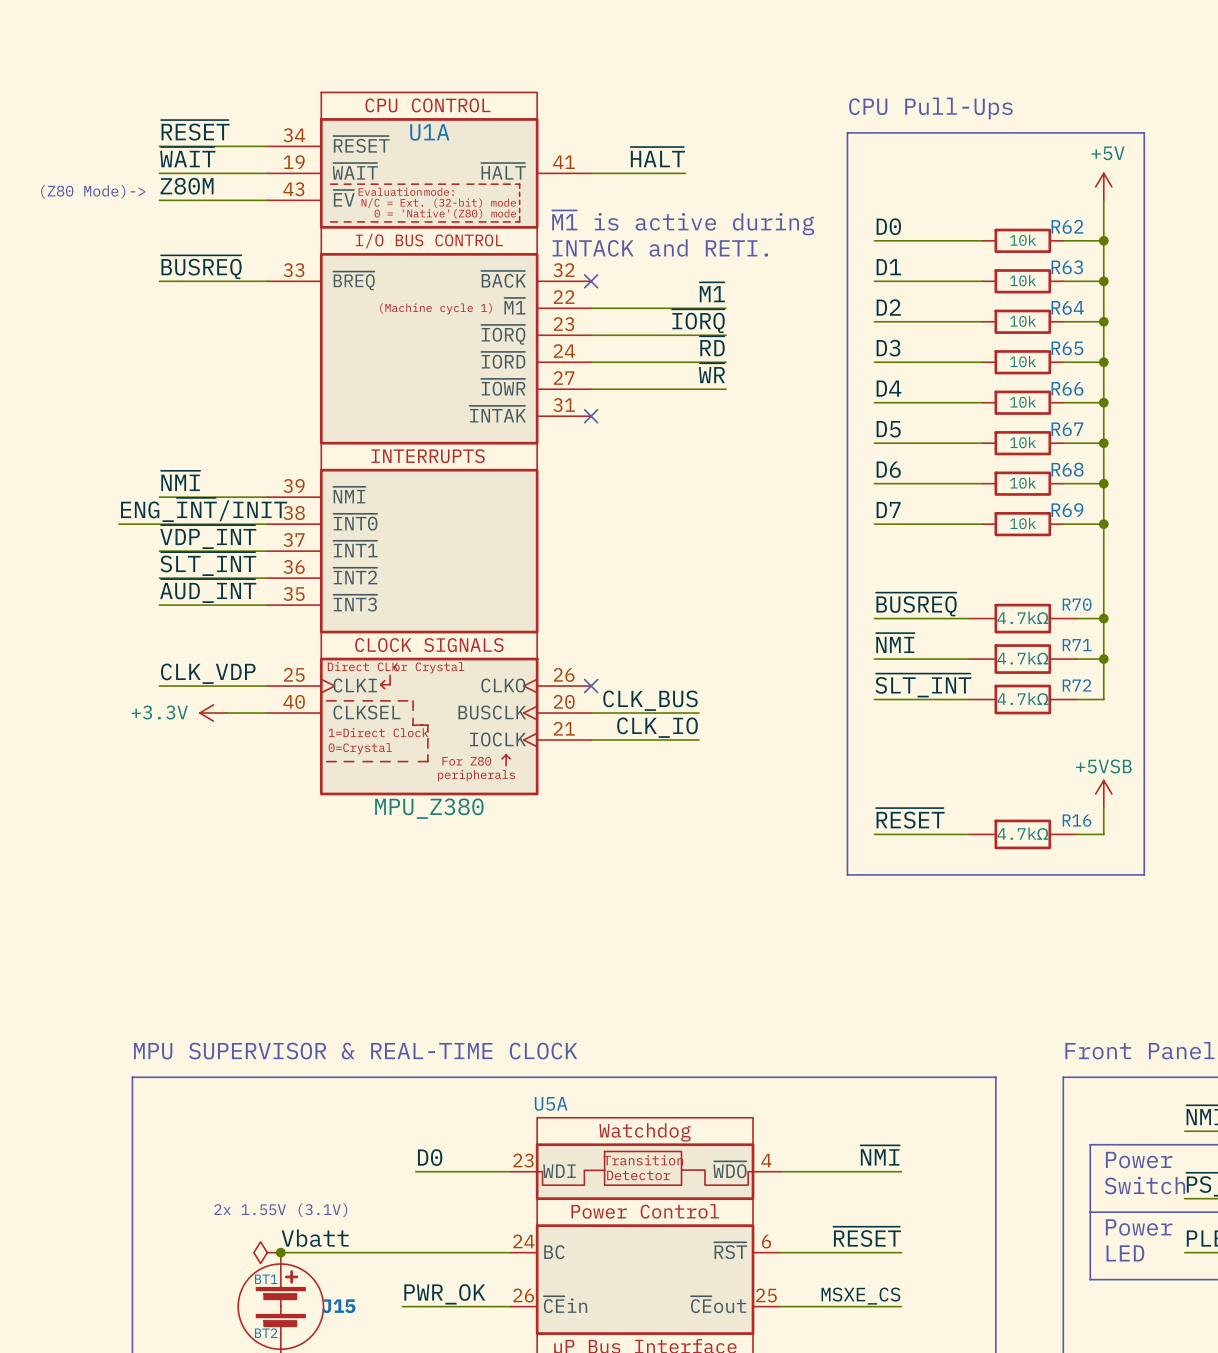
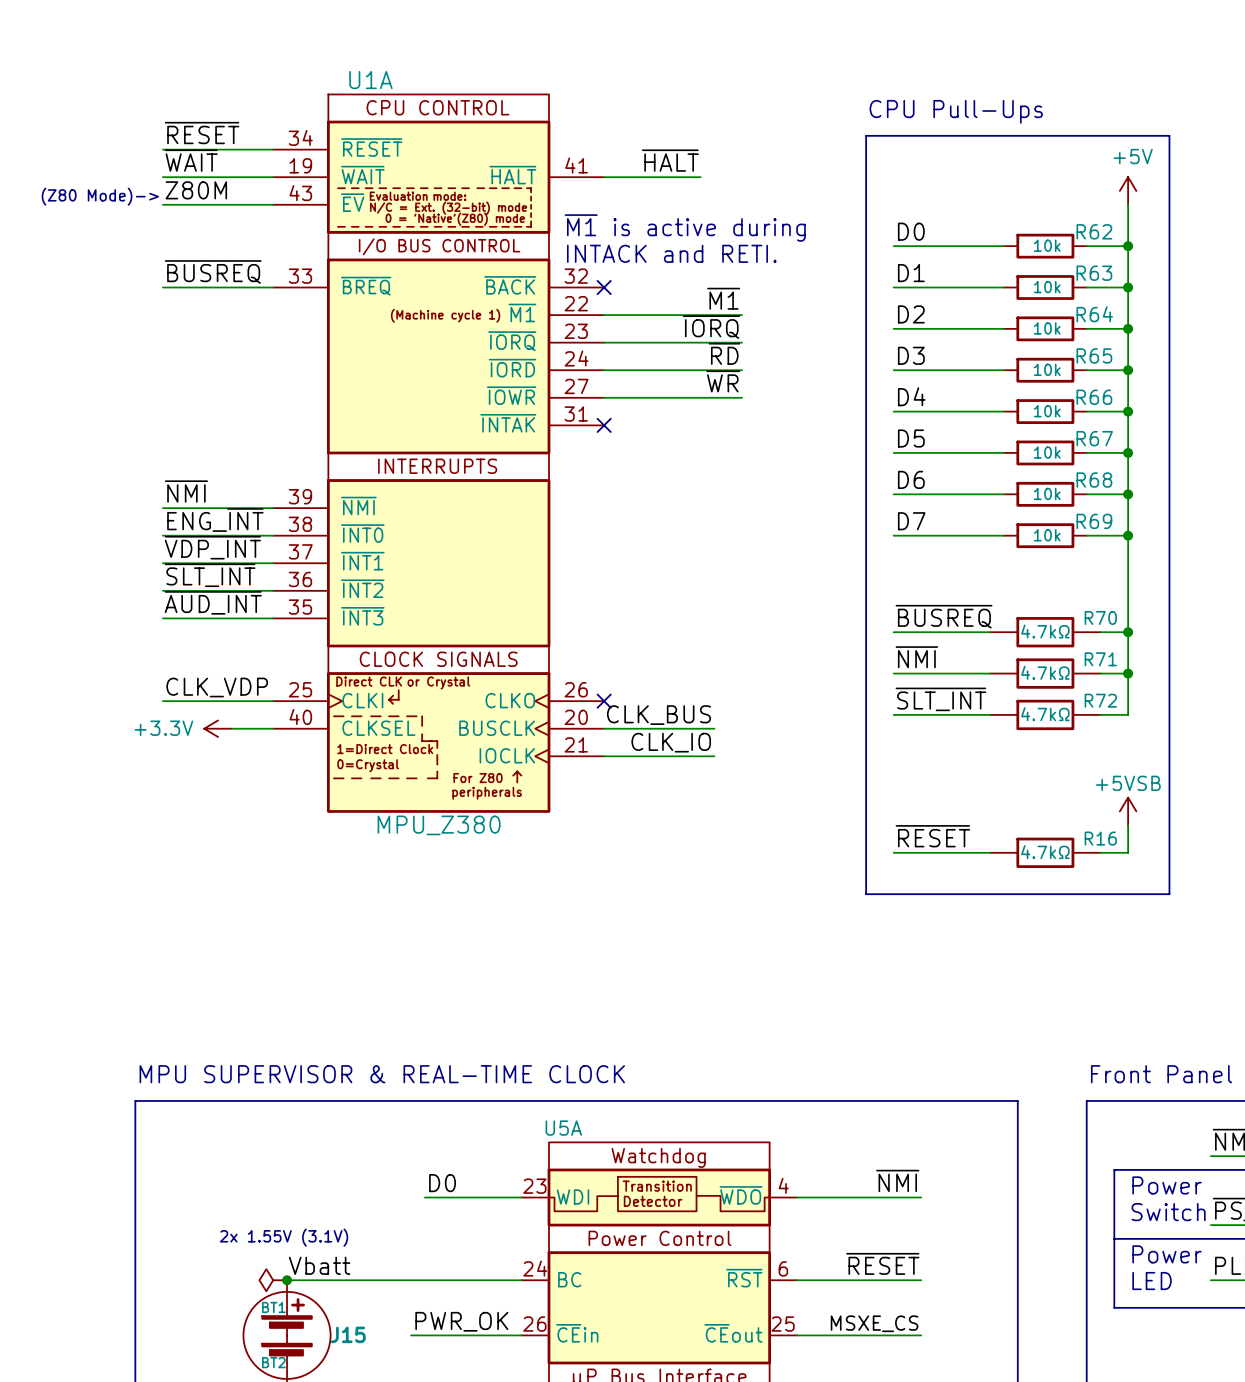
U1A name position: U1A (429, 132) -> U1A (370, 80)
label: ENG_~{INT}/INIT (204, 509) -> ENG_~{INT} (215, 519)
wire: (118, 524) (159, 524) -> none

